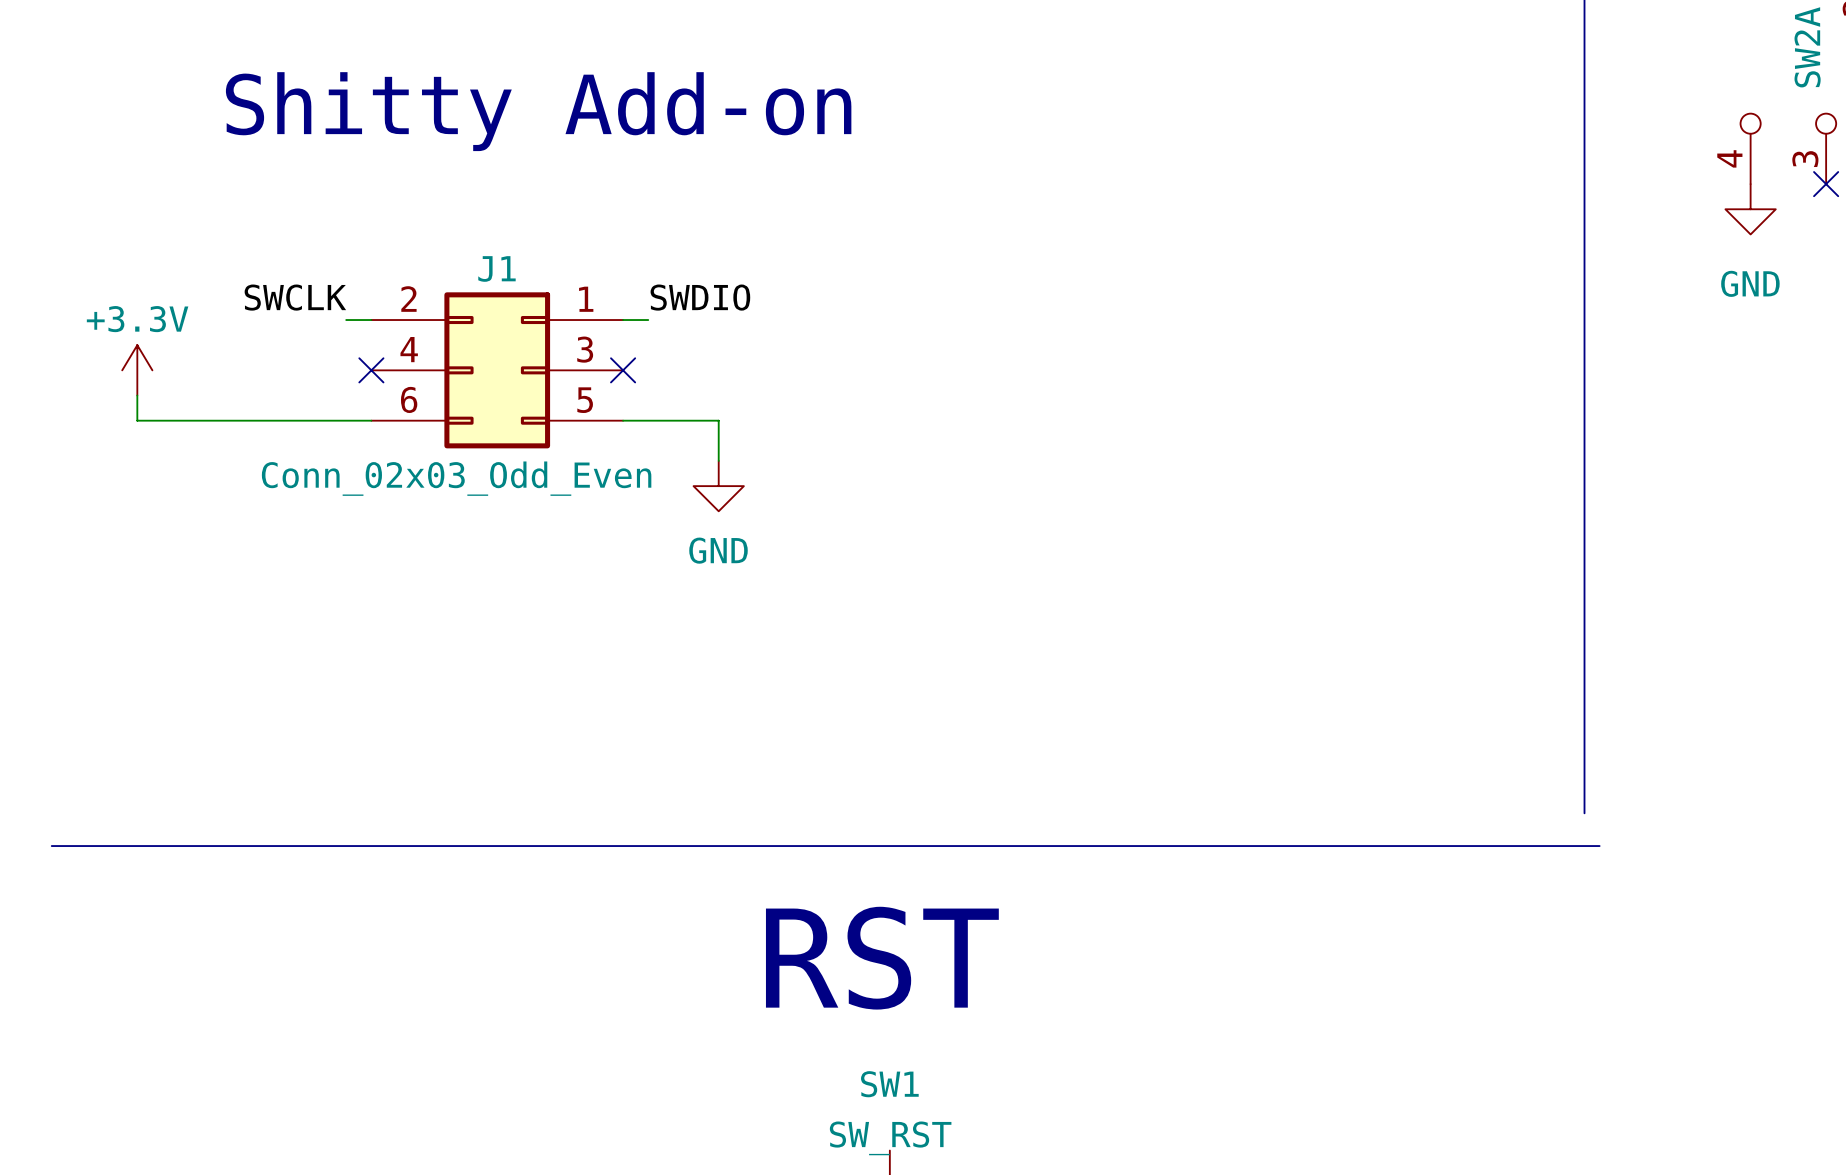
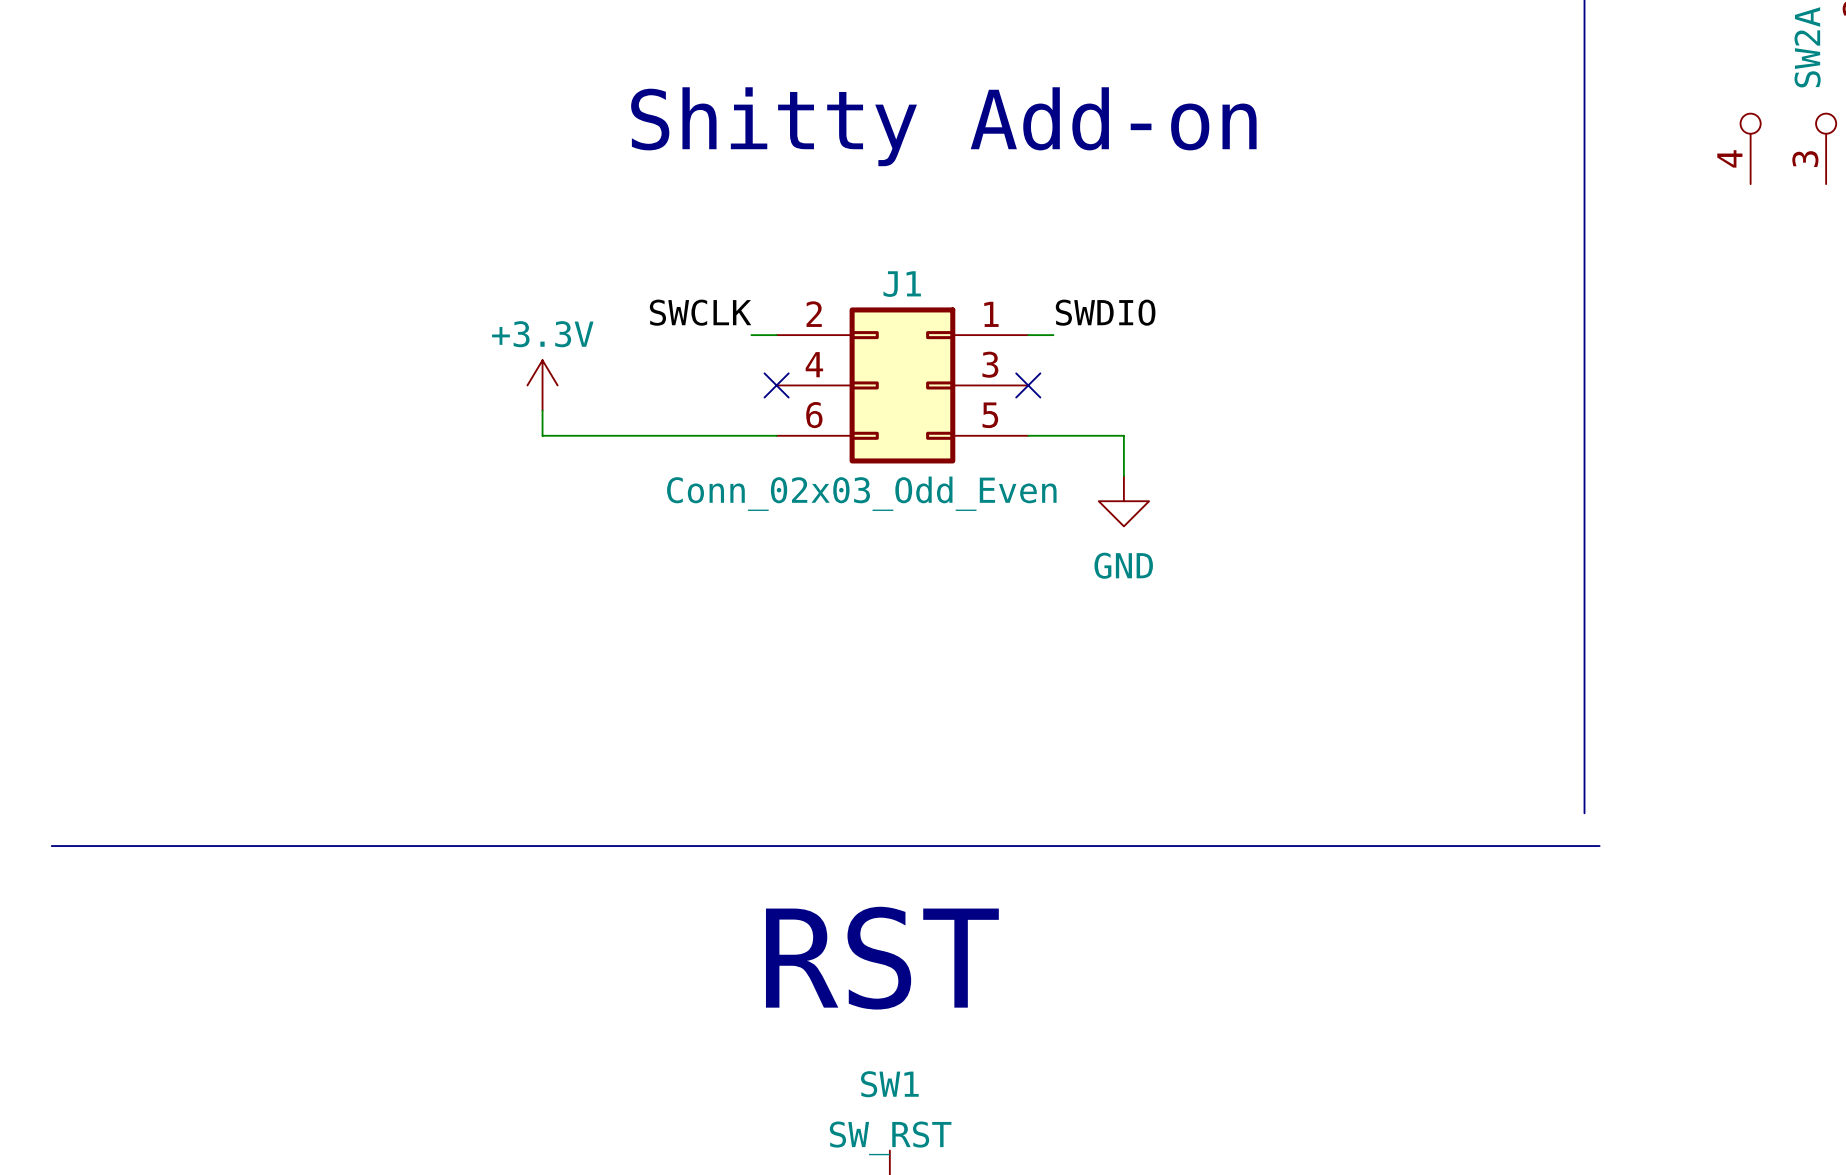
text position: Shitty Add-on (538, 111) -> Shitty Add-on (943, 126)
no-connect mark: (1826, 184) -> none
power symbol: GND (1750, 209) -> none
label position: SWCLK (295, 297) -> SWCLK (700, 312)
label: SWDIO (700, 297) -> none
label: none -> SWDIO (1105, 312)
wire: (346, 320) (371, 320) -> (751, 335) (776, 335)
wire: (623, 320) (648, 320) -> (1028, 335) (1053, 335)
power symbol position: +3.3V (137, 370) -> +3.3V (542, 385)
no-connect mark: (371, 370) -> none
J1 position: (497, 370) -> (902, 385)
no-connect mark: (623, 370) -> none
no-connect mark: none -> (776, 385)
no-connect mark: none -> (1028, 385)
wire: (137, 395) (137, 420) (371, 420) -> (542, 410) (542, 435) (776, 435)
wire: (623, 420) (718, 420) (718, 460) -> (1028, 435) (1123, 435) (1123, 476)
power symbol: GND (718, 486) -> none
power symbol: none -> GND (1123, 501)

